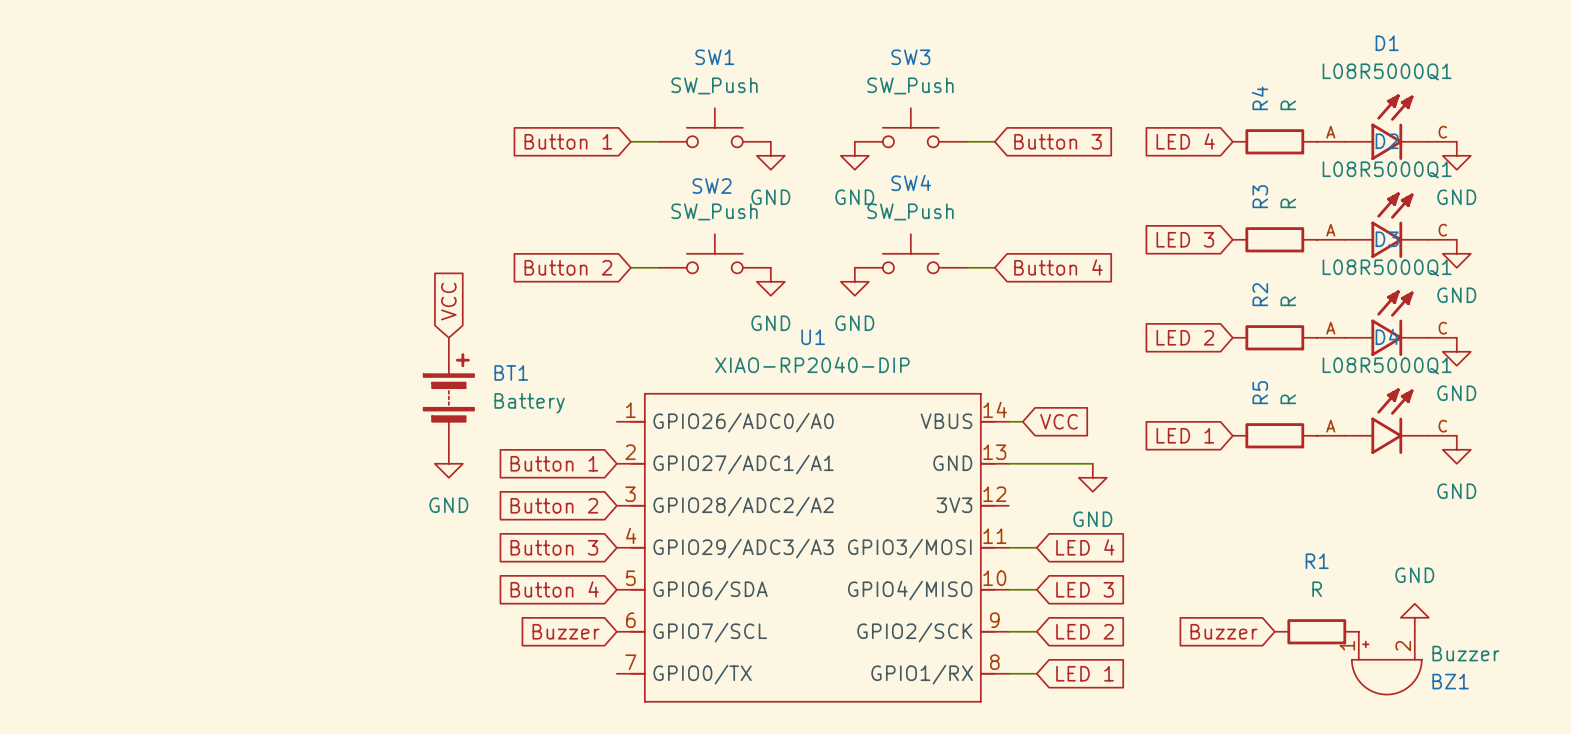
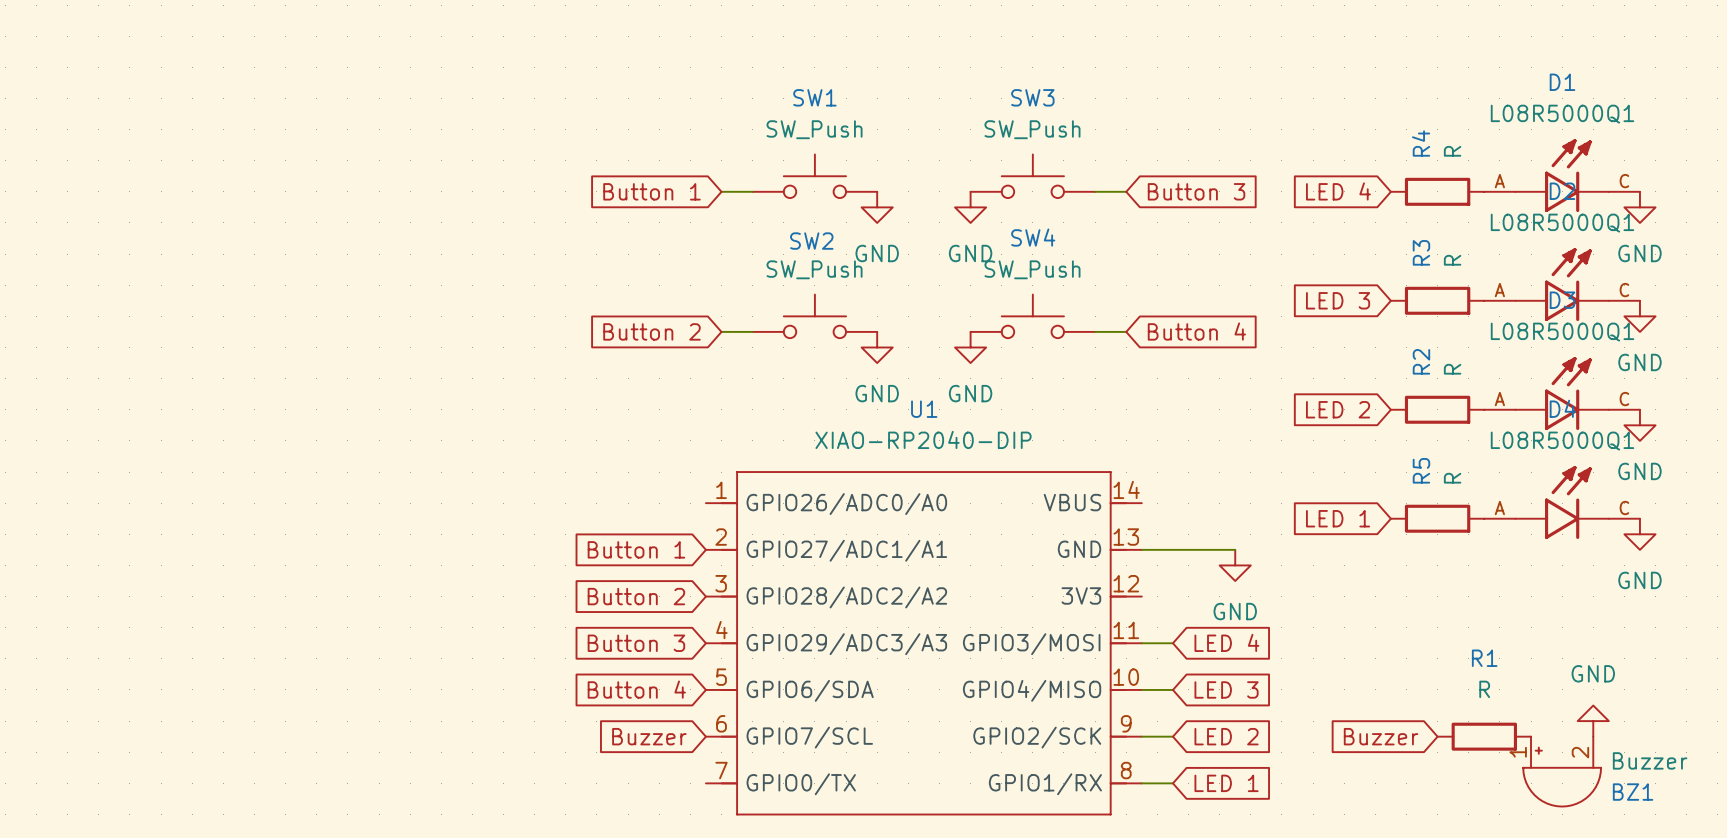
global label: VCC (448, 301) -> none
BT1: Battery (448, 393) -> none
wire: (1008, 421) (1022, 421) -> none
global label: VCC (1059, 421) -> none
power symbol: GND (448, 463) -> none

